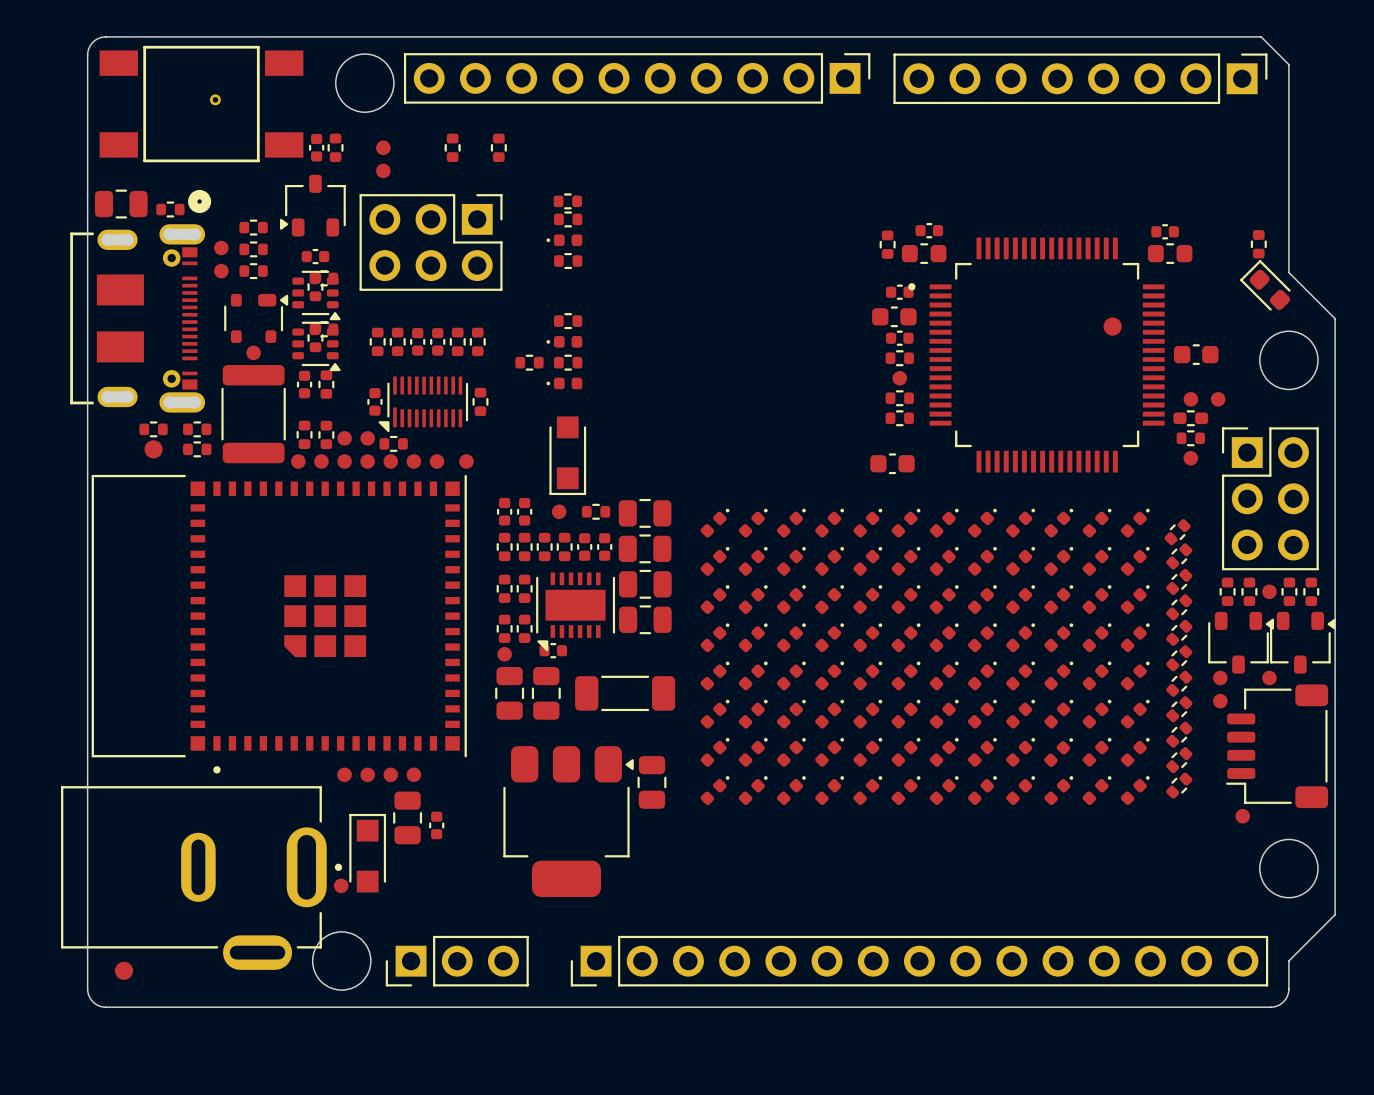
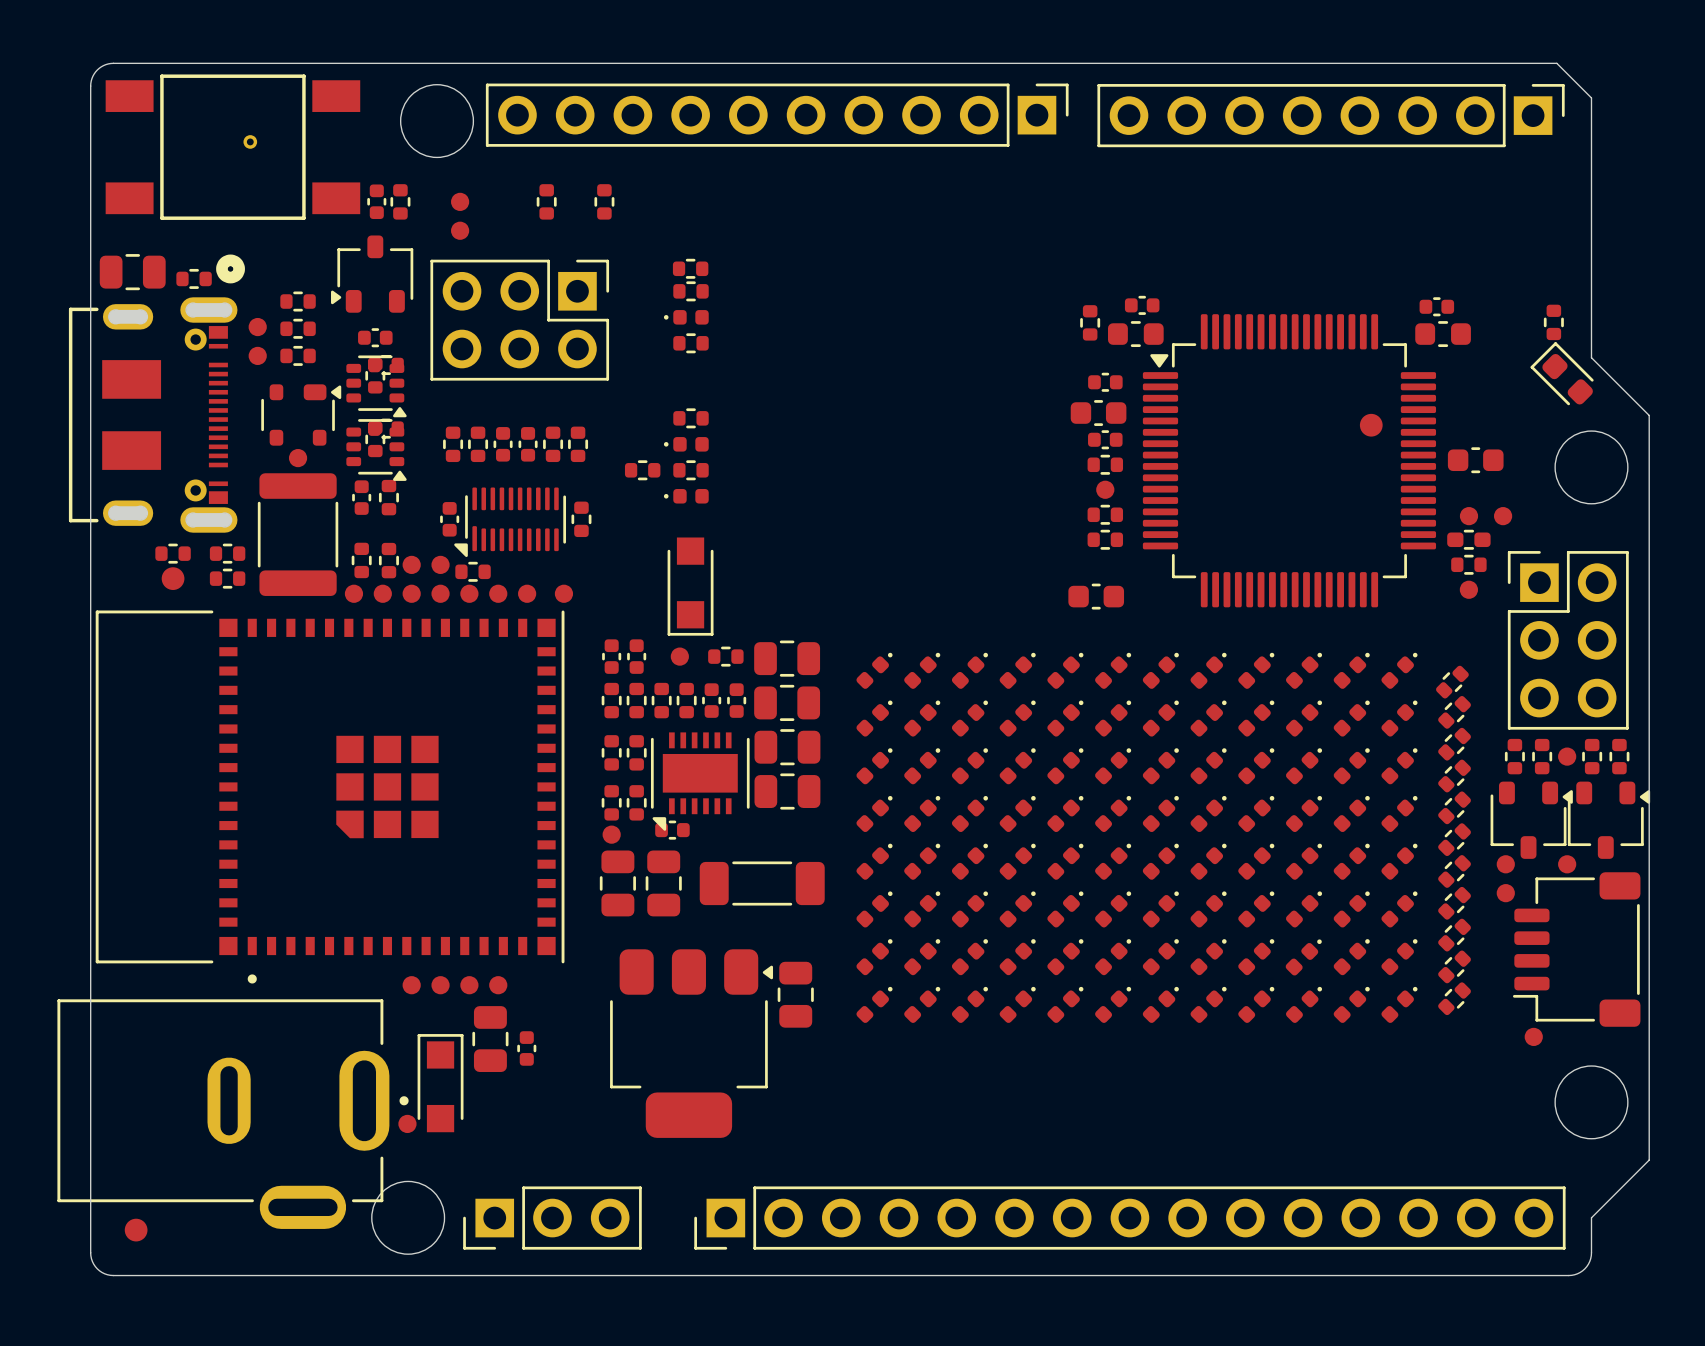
part footprint: [908, 237, 1165, 473] -> [1142, 314, 1437, 608]

